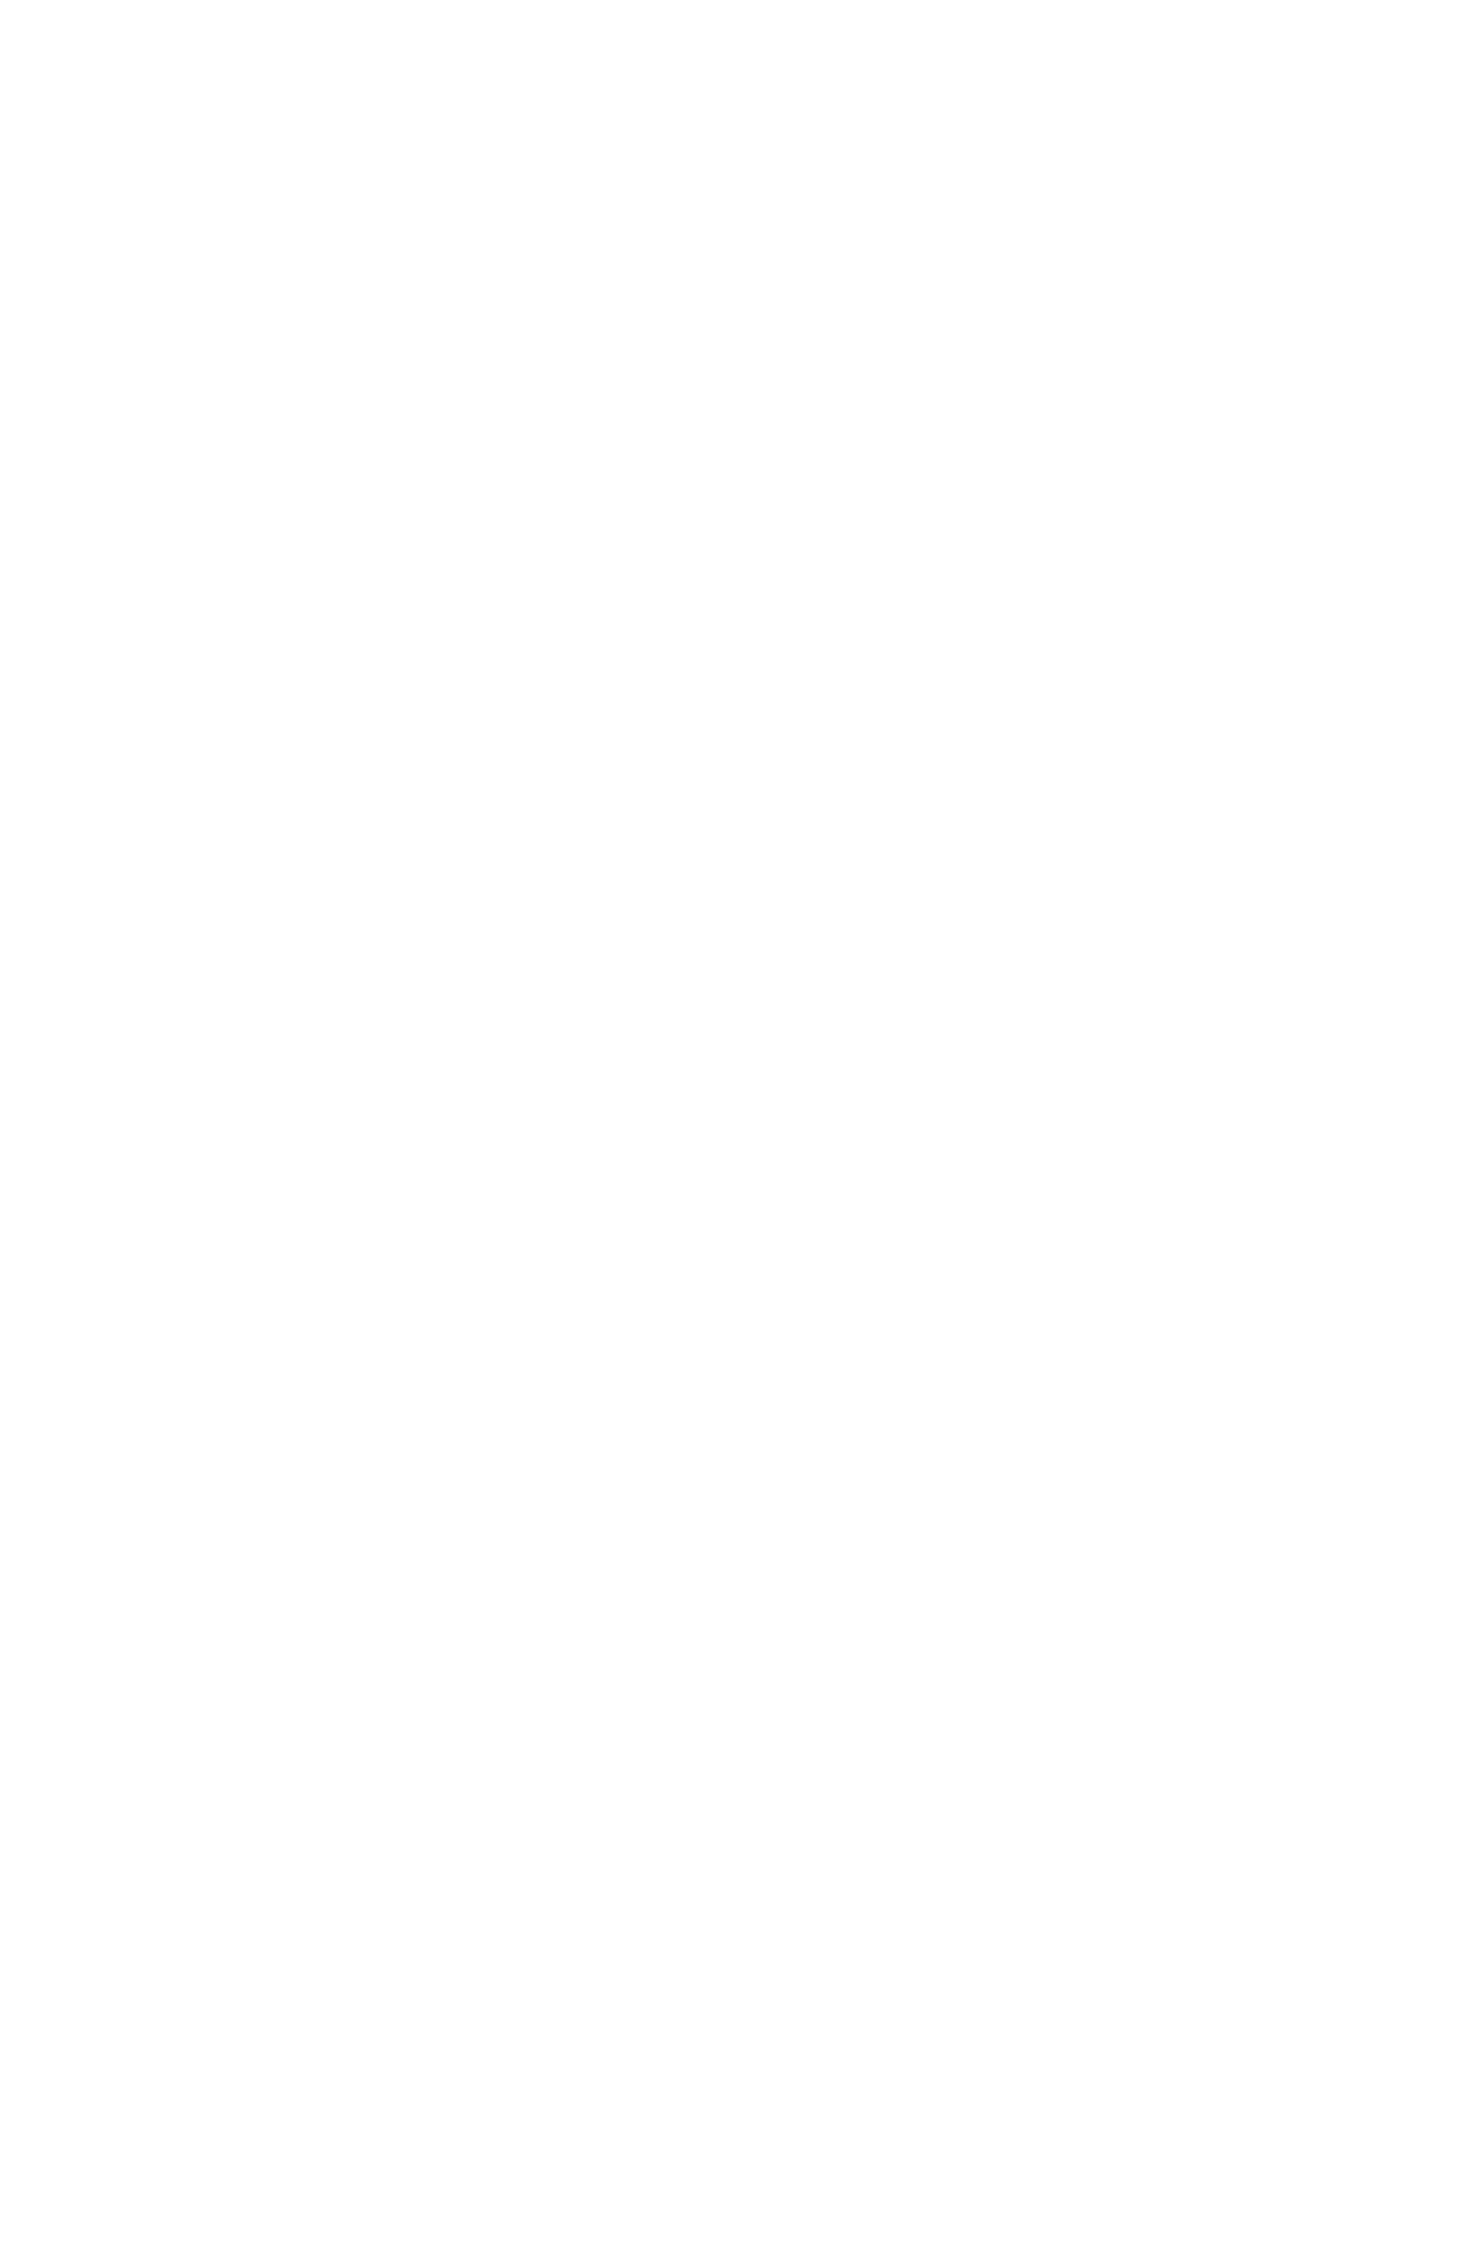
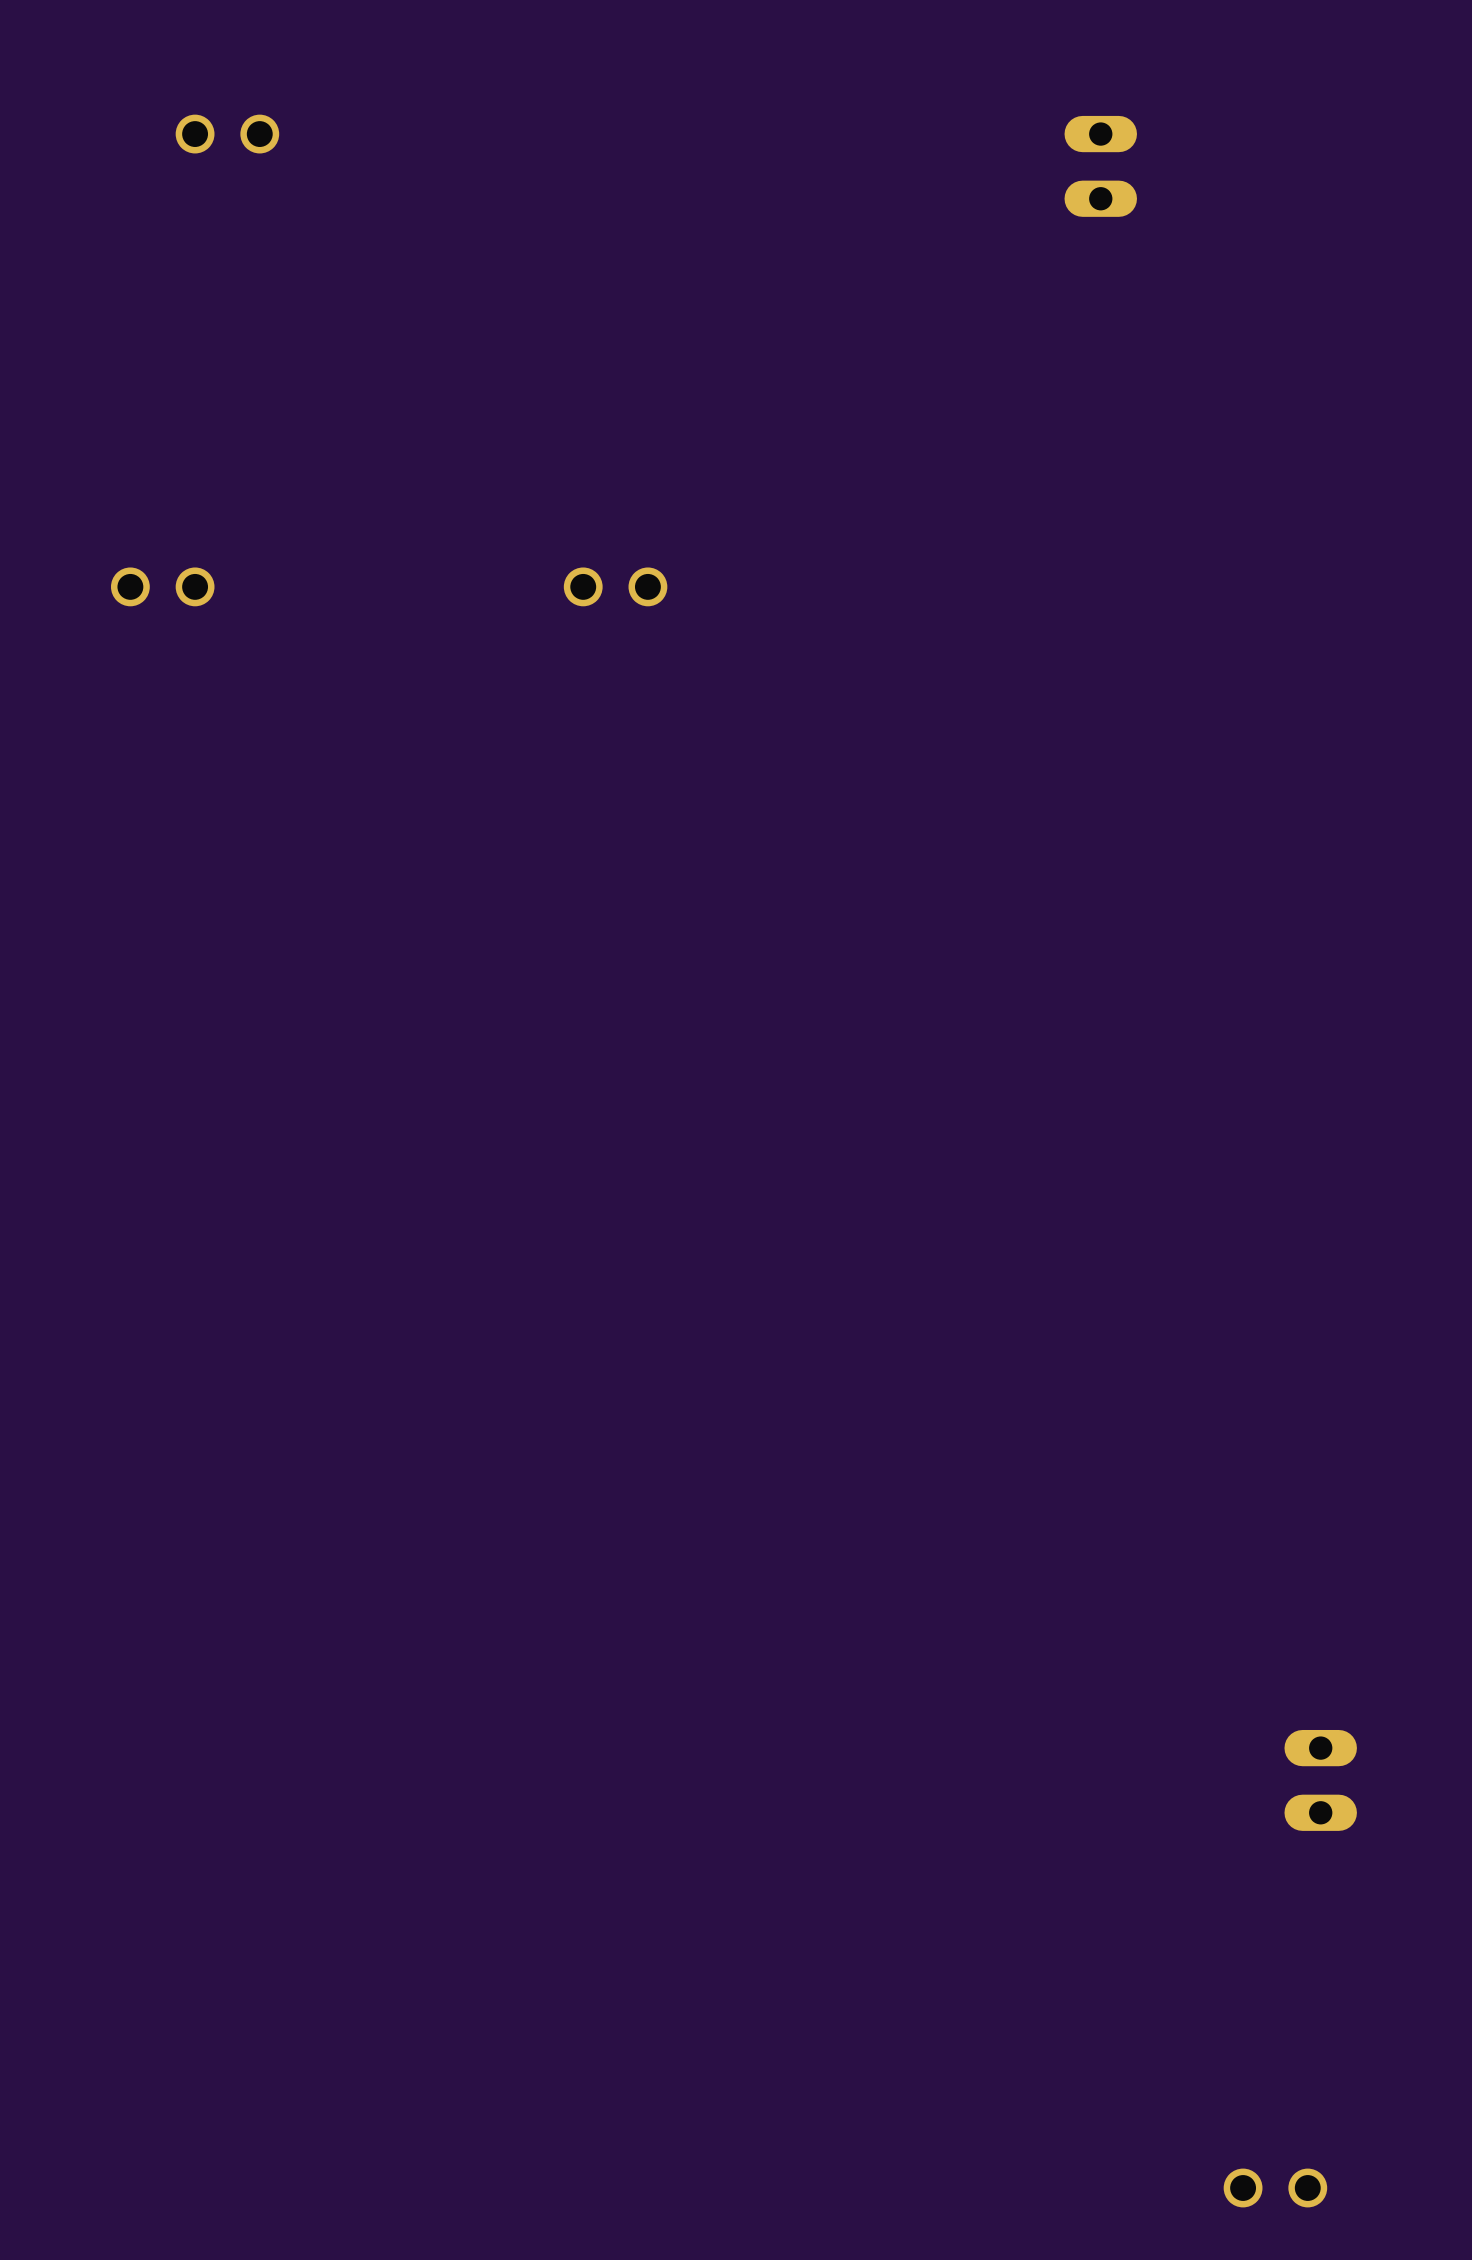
part: none -> (227, 134)
part: none -> (1100, 166)
part: none -> (162, 586)
part: none -> (615, 586)
part: none -> (1320, 1780)
part: none -> (1275, 2188)

